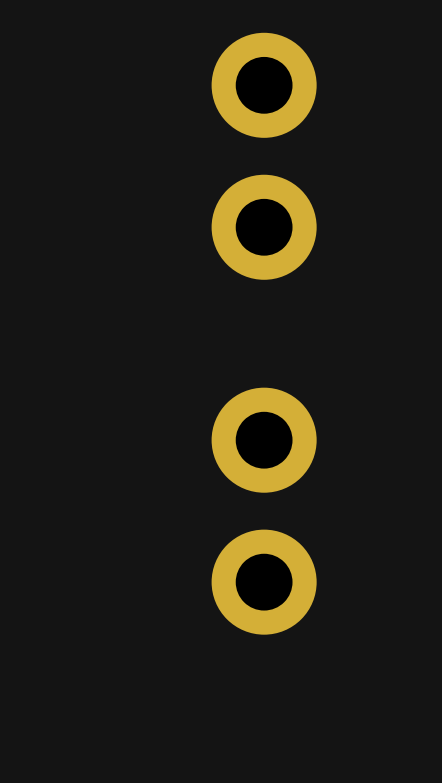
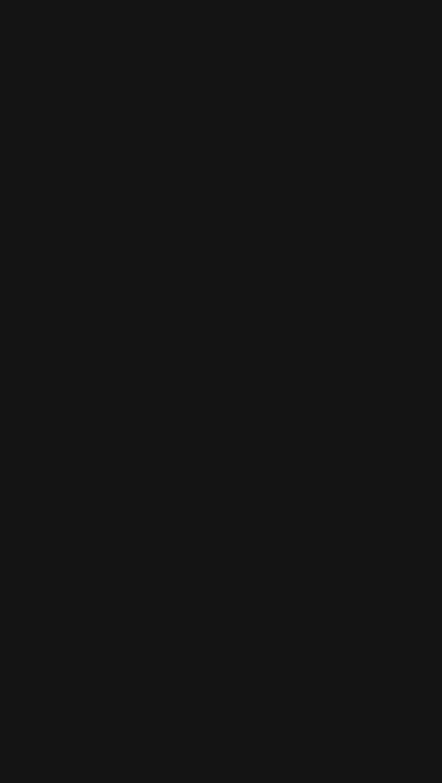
part: (264, 156) -> none
part: (264, 511) -> none

